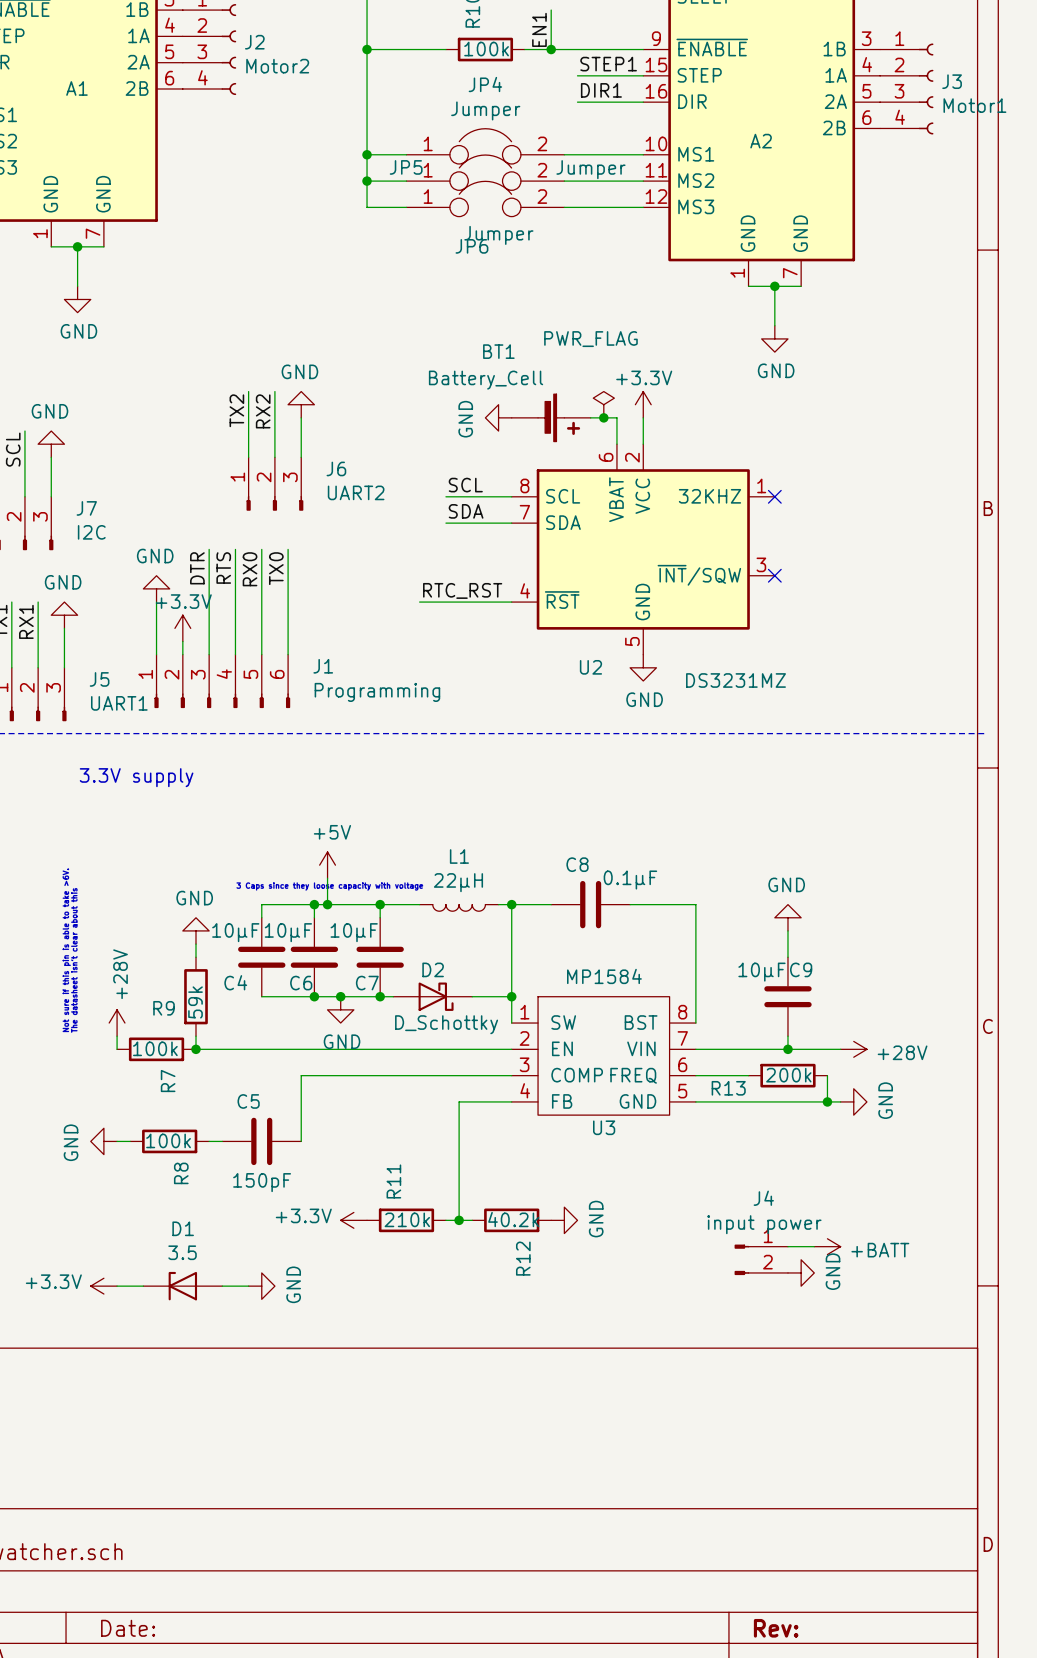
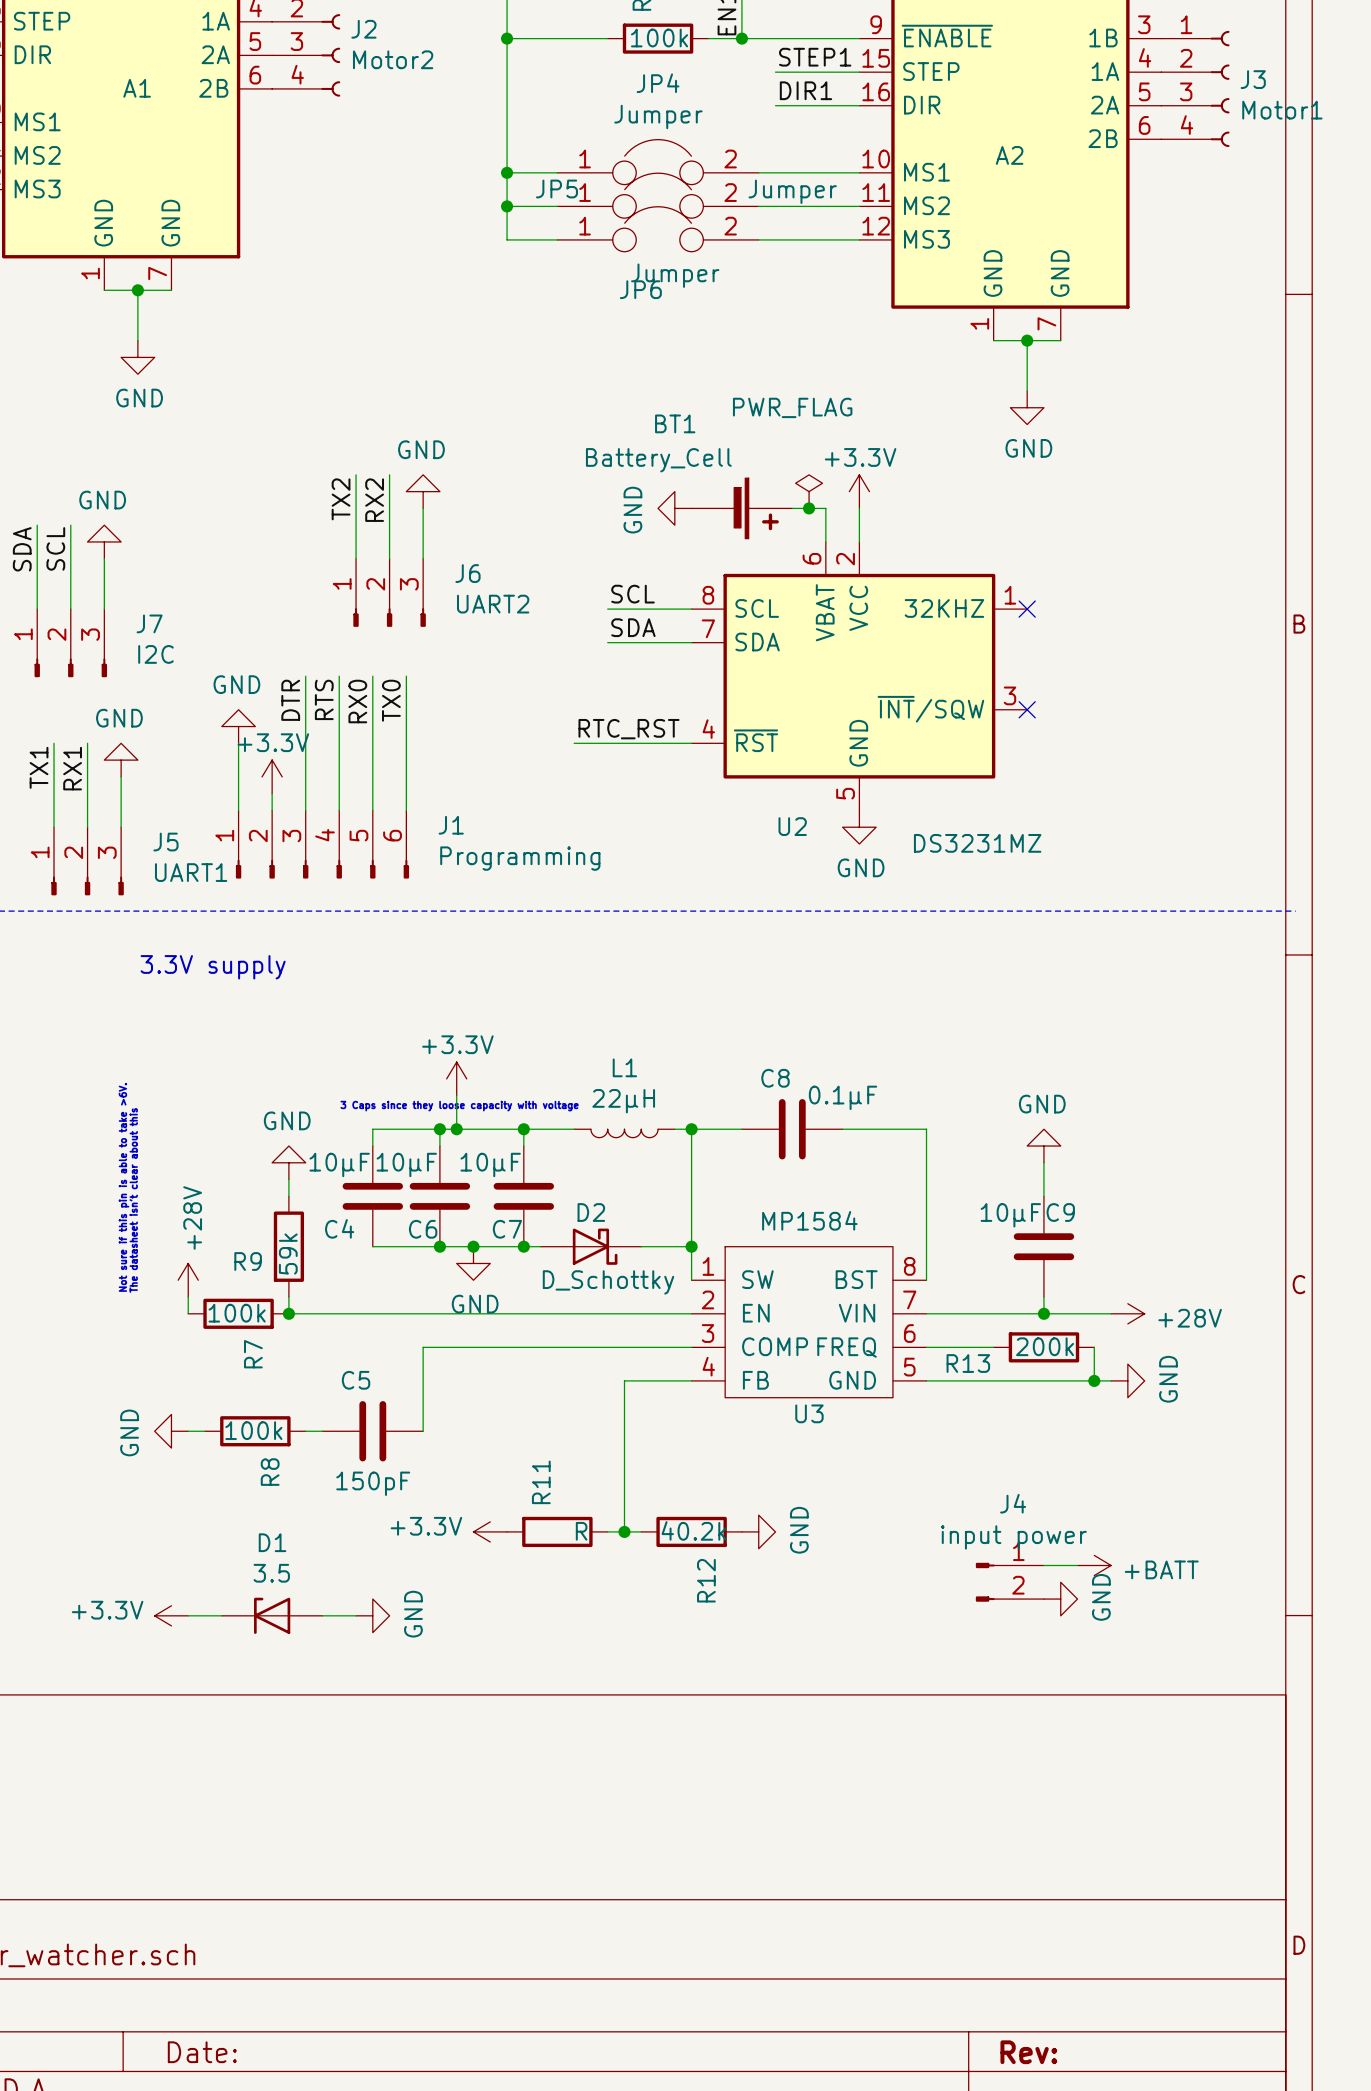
power symbol: +5V (327, 865) -> +3.3V (456, 1078)
R11 value: 210k (407, 1219) -> R (581, 1531)

